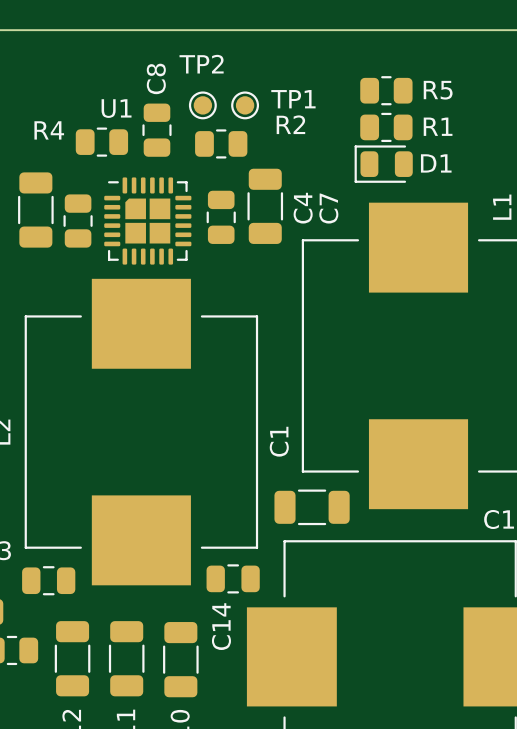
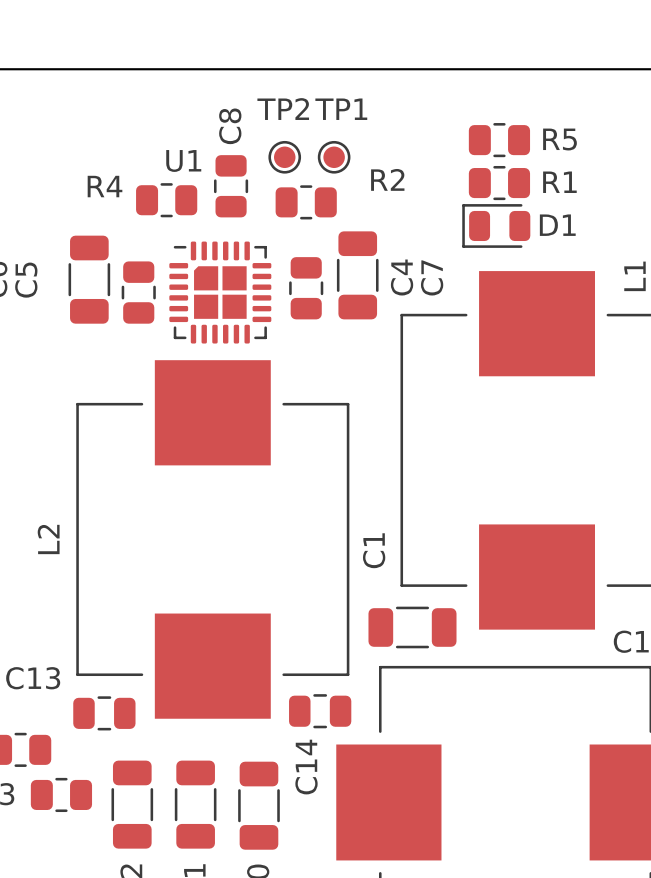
TP1 name position: TP1 (293, 99) -> TP1 (341, 109)

